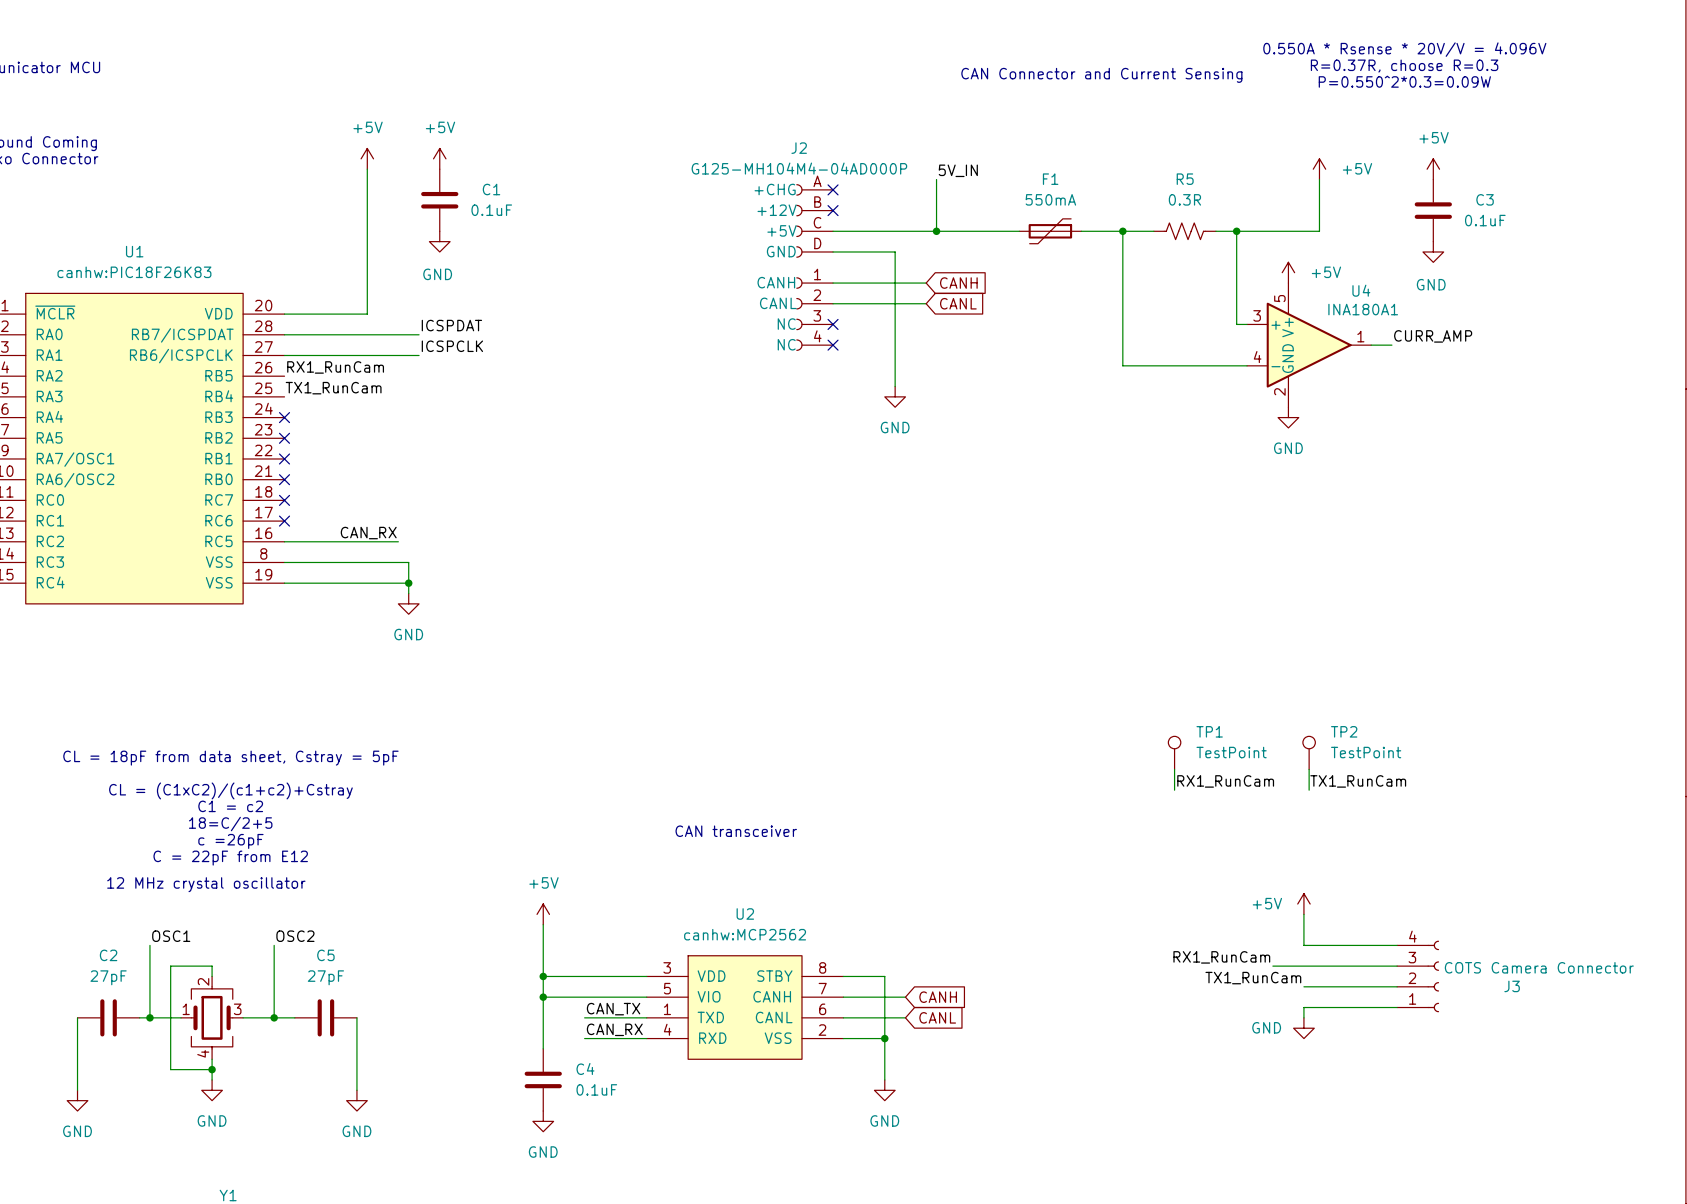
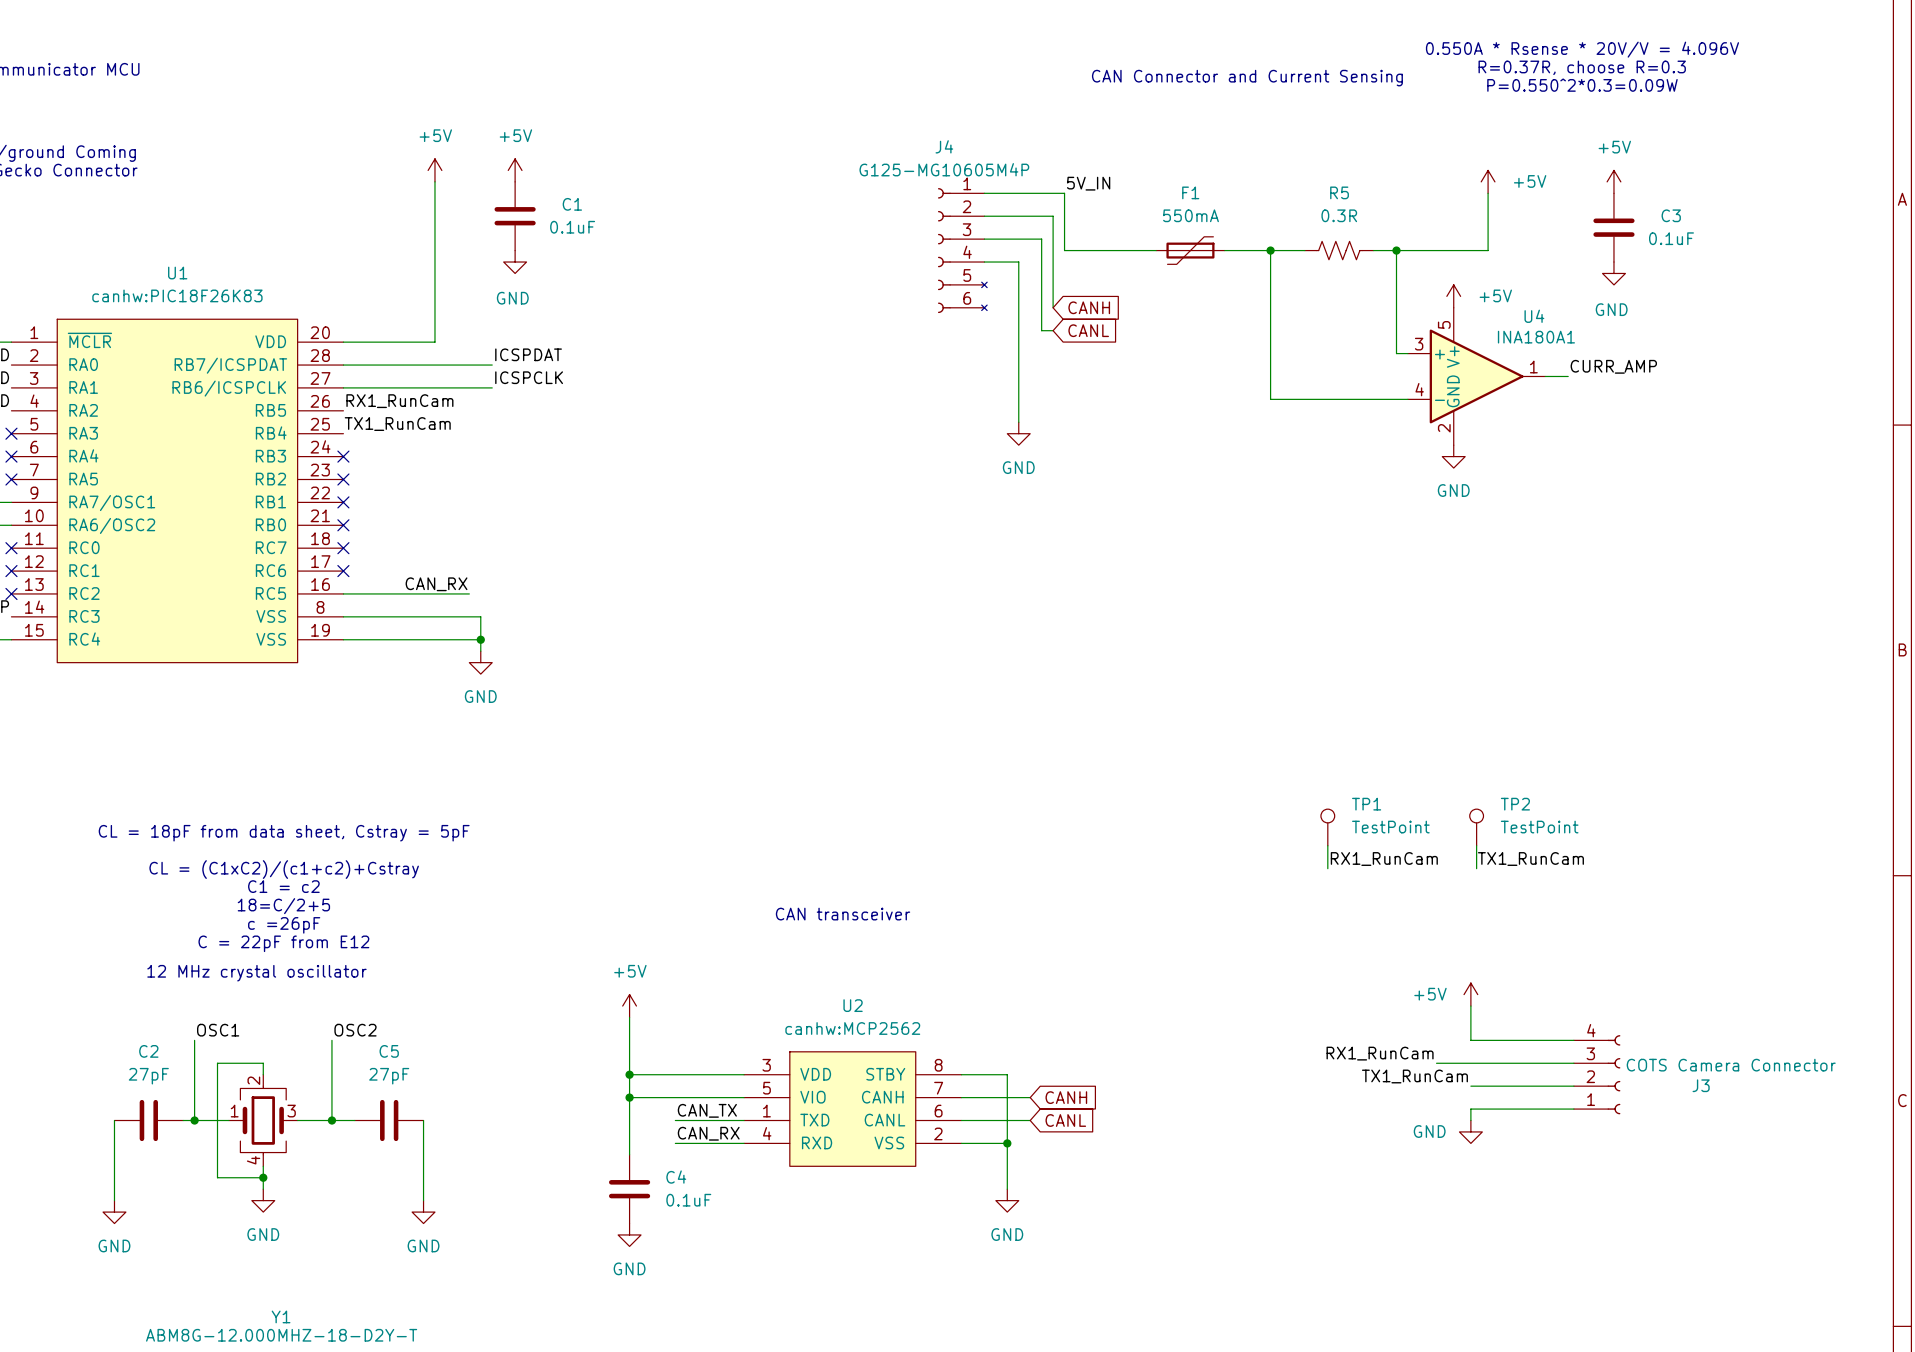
wire: none -> (984, 193) (1064, 193)
no-connect mark: (833, 189) -> none
no-connect mark: (833, 210) -> none
wire: (833, 231) (936, 231) -> none
J4: none -> G125-MG10605M4P (962, 250)
junction: (936, 231) -> none
wire: (833, 251) (895, 251) -> (984, 262) (1018, 262) (1018, 273)
J2: G125-MH104M4-04AD000P (814, 267) -> none
wire: (833, 283) (926, 283) -> (984, 216) (1053, 216) (1053, 307)
wire: (833, 303) (915, 303) -> (984, 239) (1041, 239) (1041, 330)
no-connect mark: (833, 324) -> none
no-connect mark: (833, 345) -> none

